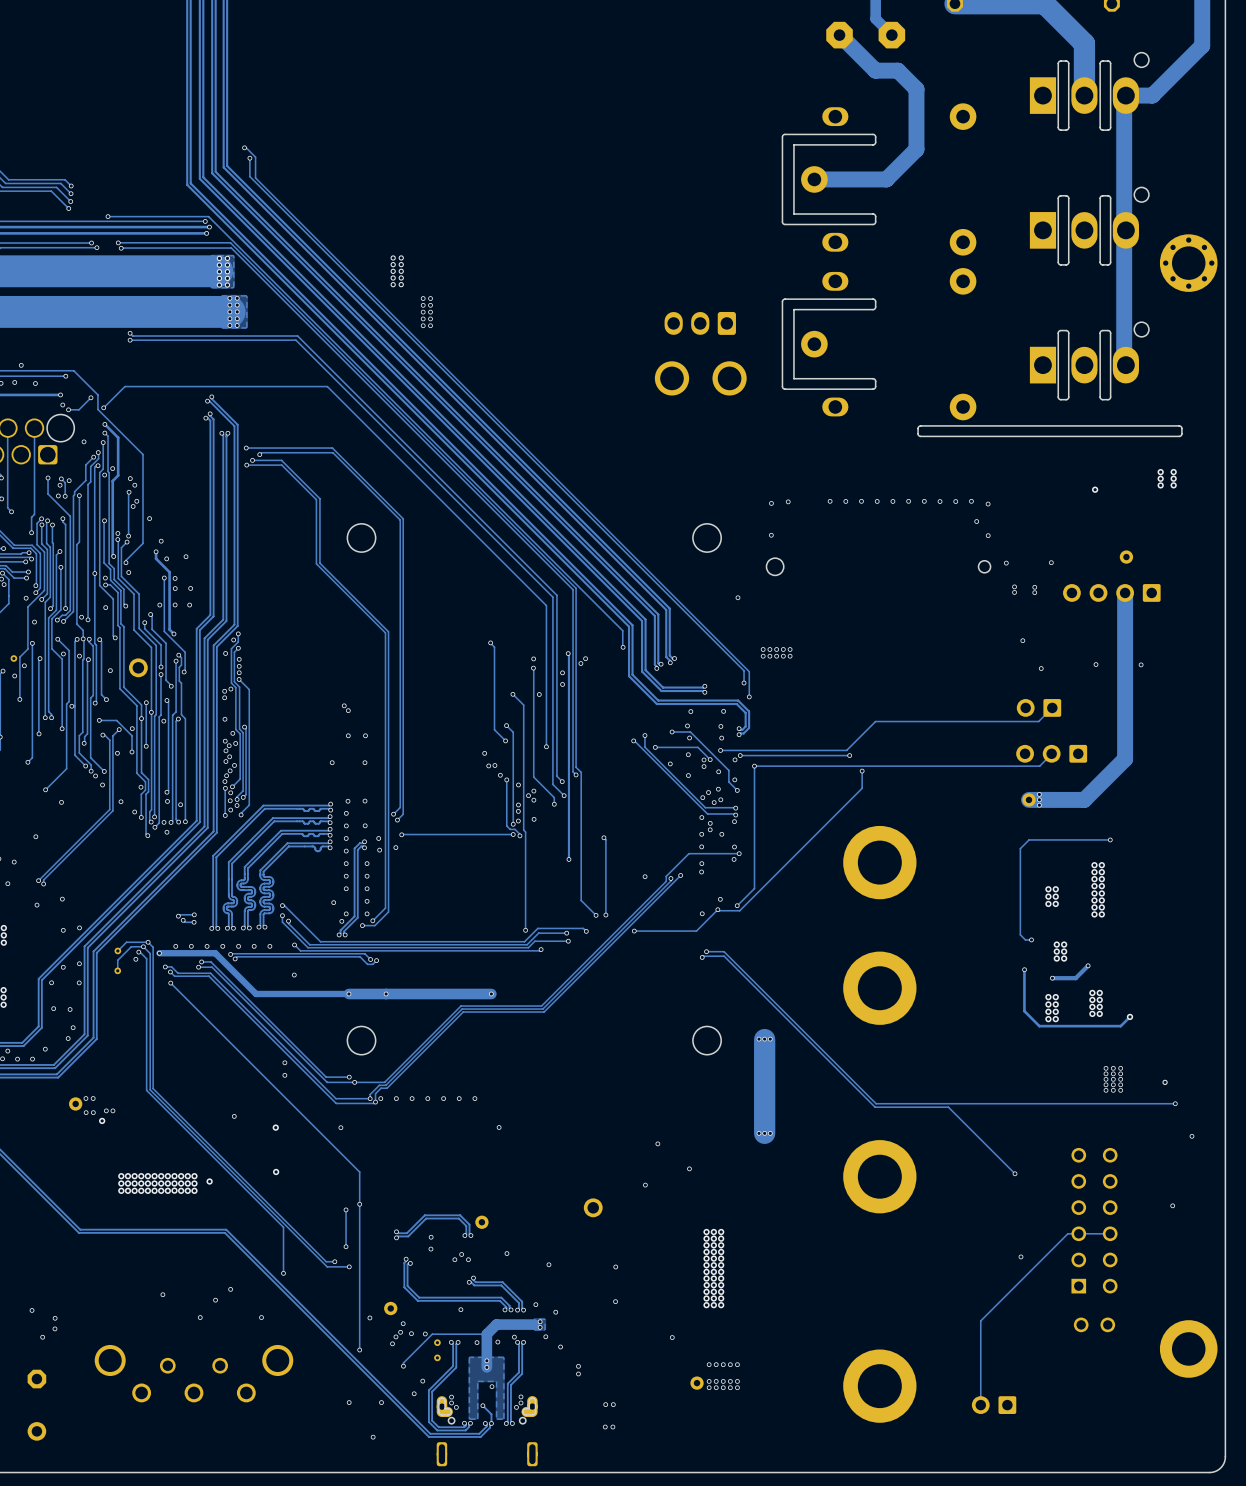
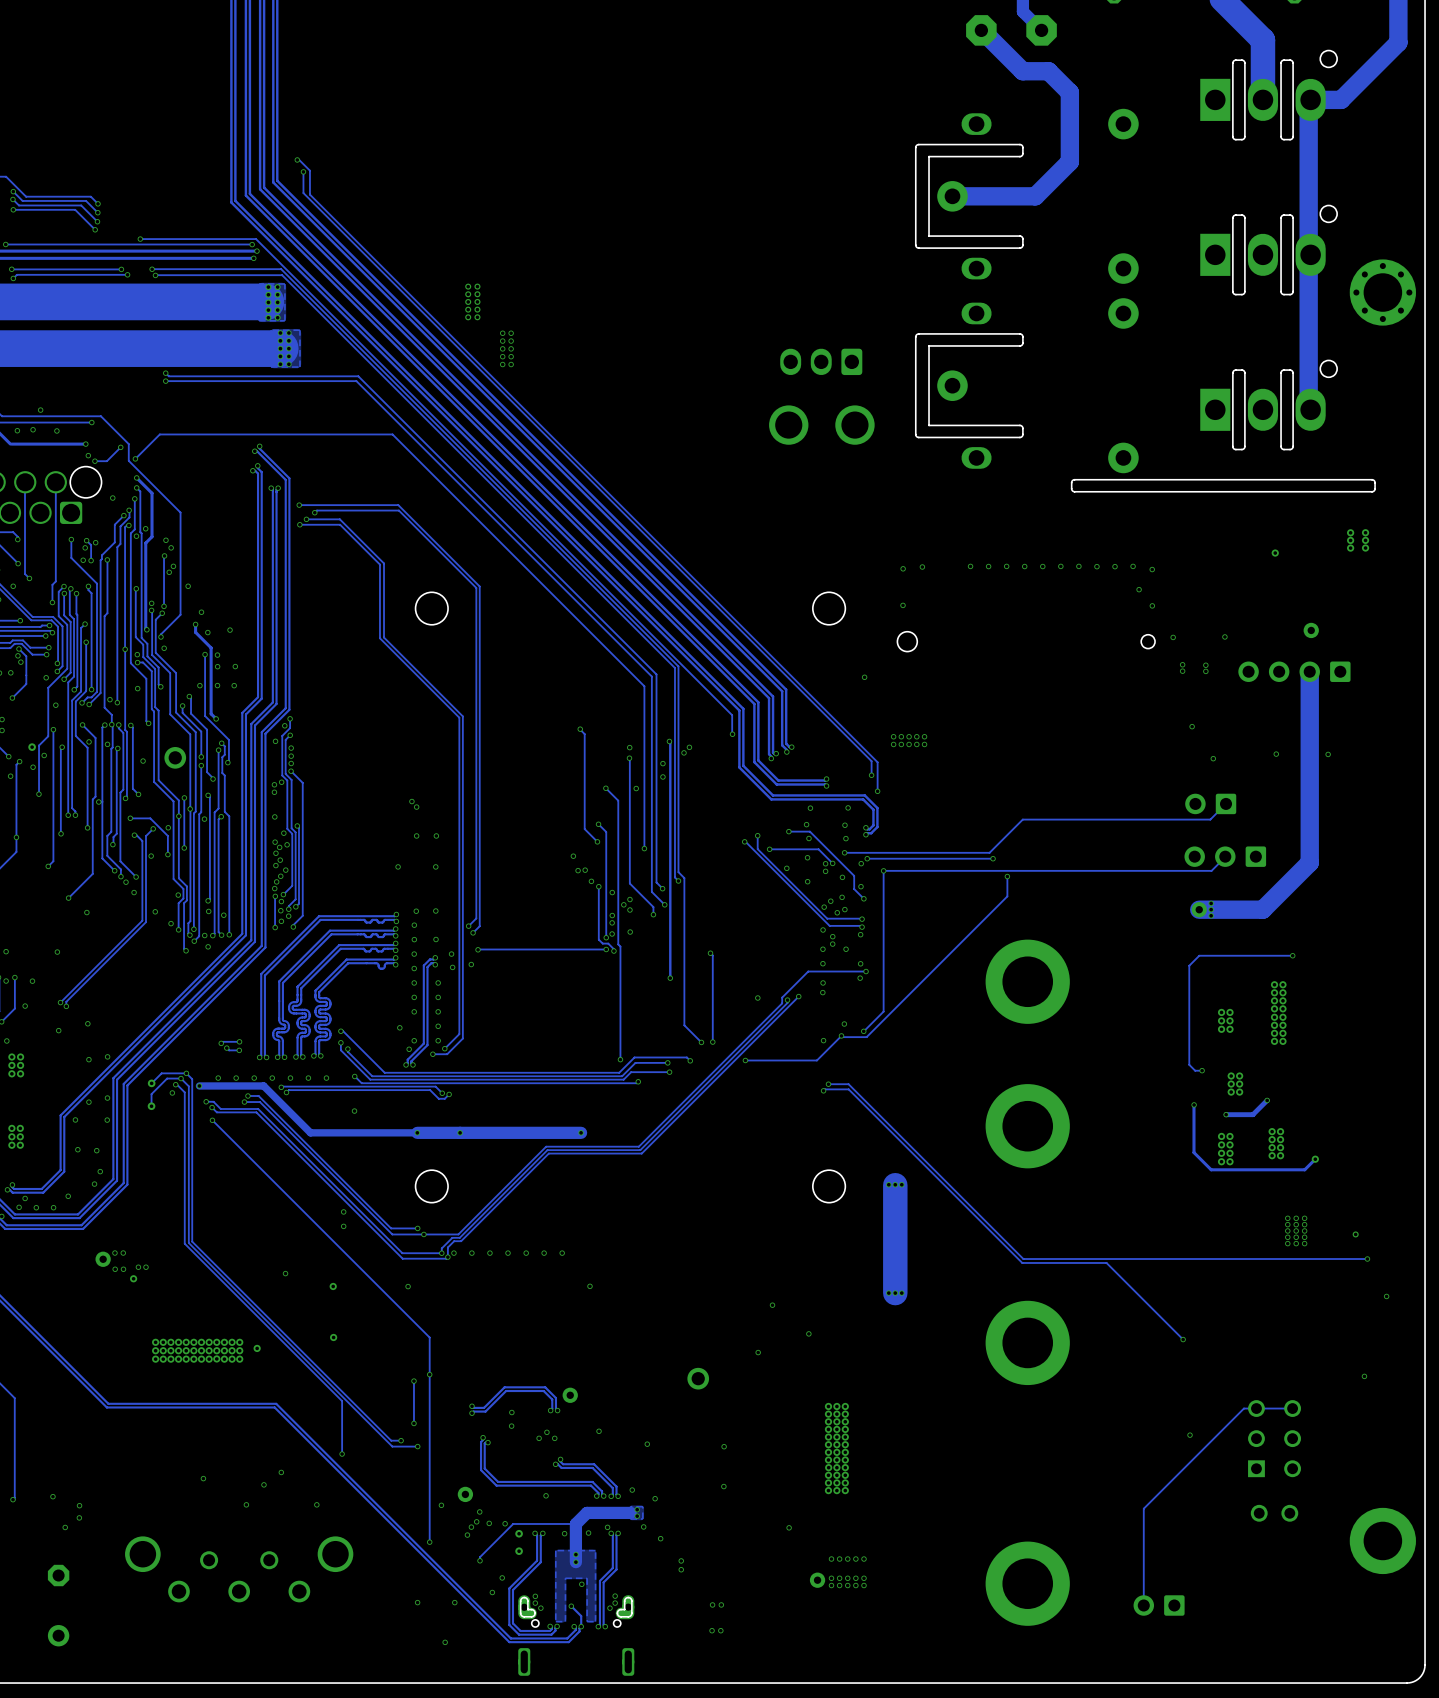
part: (1094, 1240) -> none

